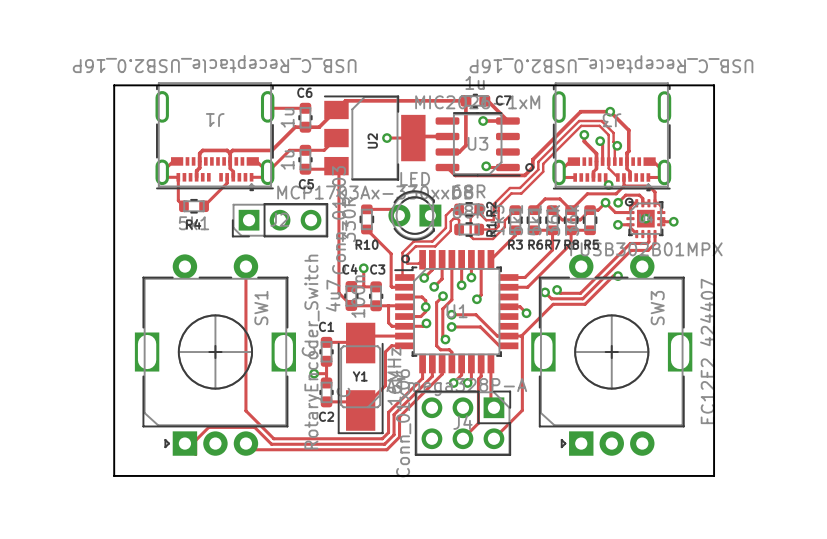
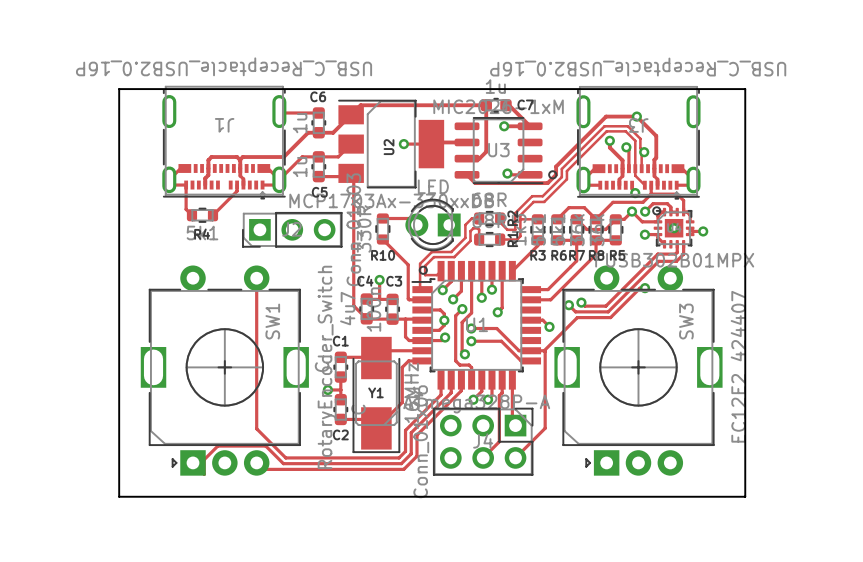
track: (479, 209) (470, 217) (470, 236) (473, 238) (492, 238) (504, 227) (504, 220) (515, 210) -> none
track: none -> (531, 219) (520, 220)

